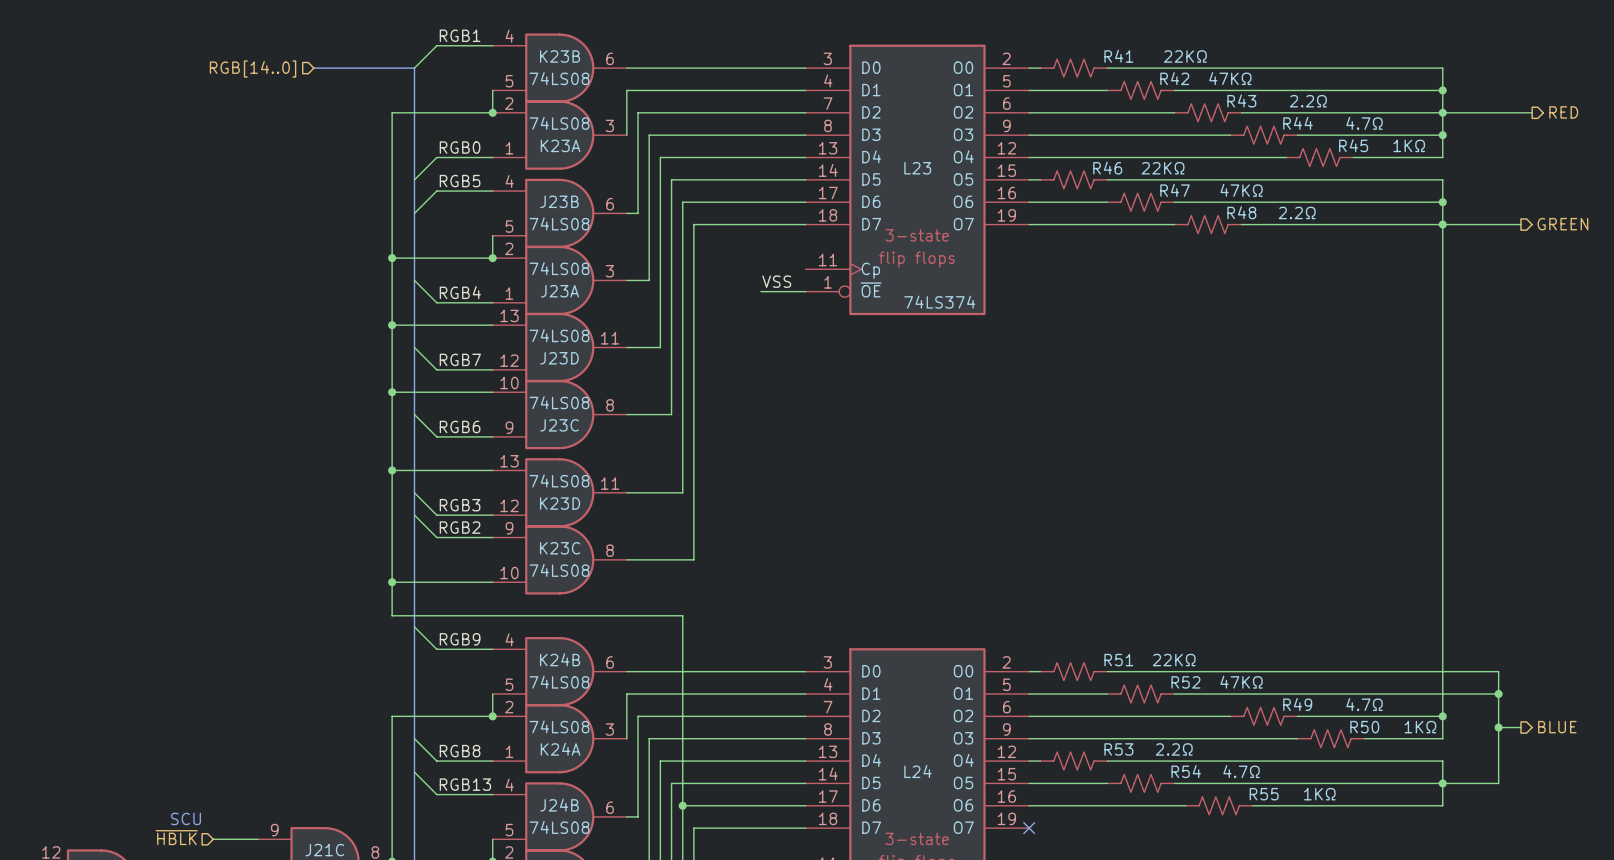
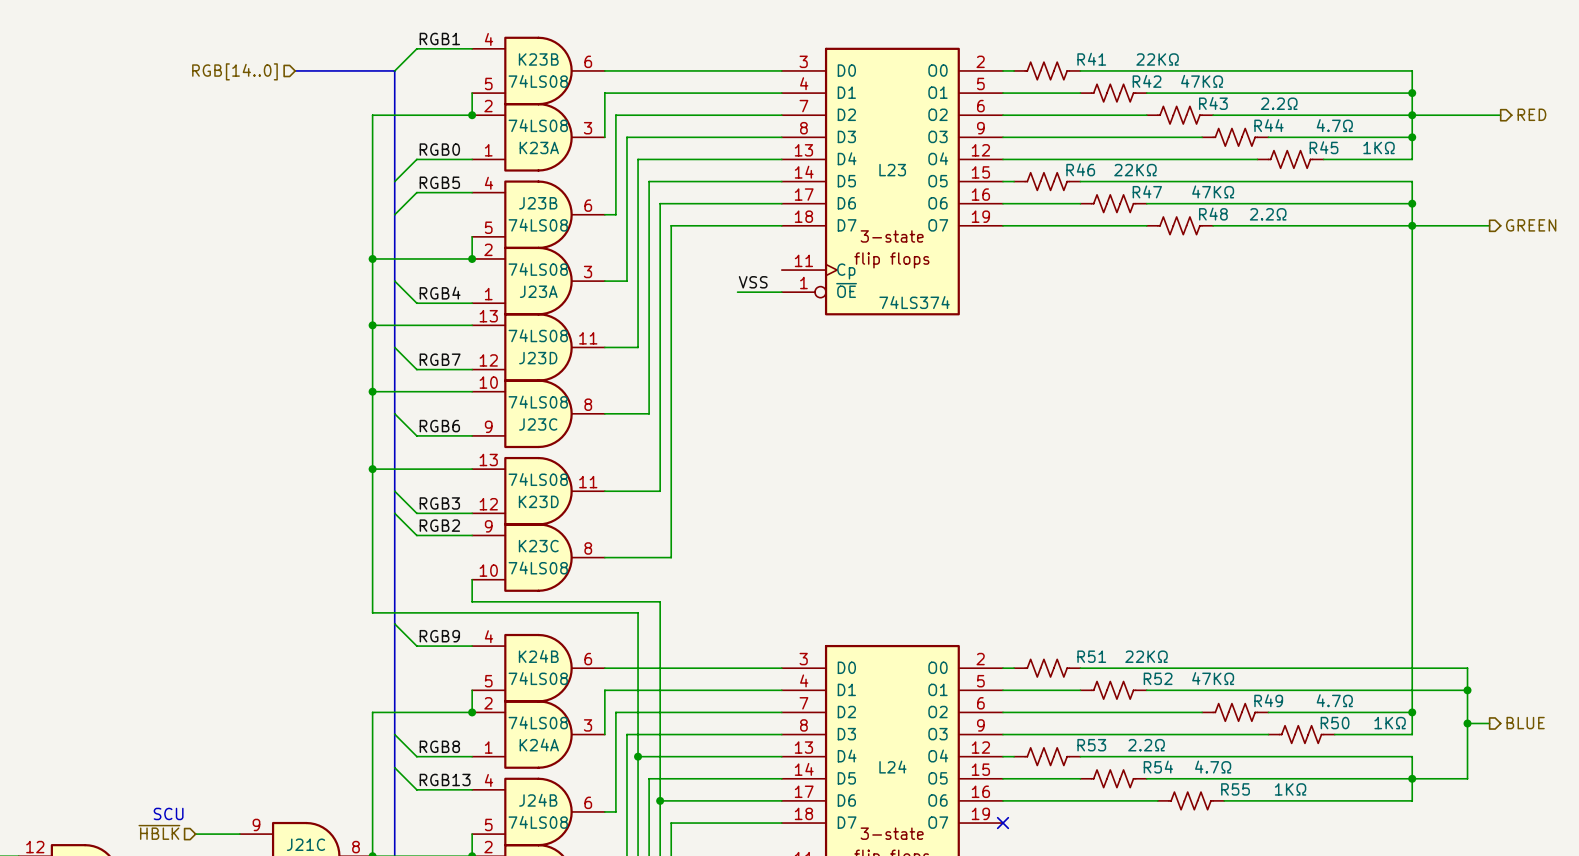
wire: (392, 582) (492, 582) -> (660, 612) (660, 601) (472, 601) (472, 579)
junction: (392, 582) -> none
wire: (660, 615) (682, 615) -> (638, 612) (638, 756)
junction: none -> (638, 756)

